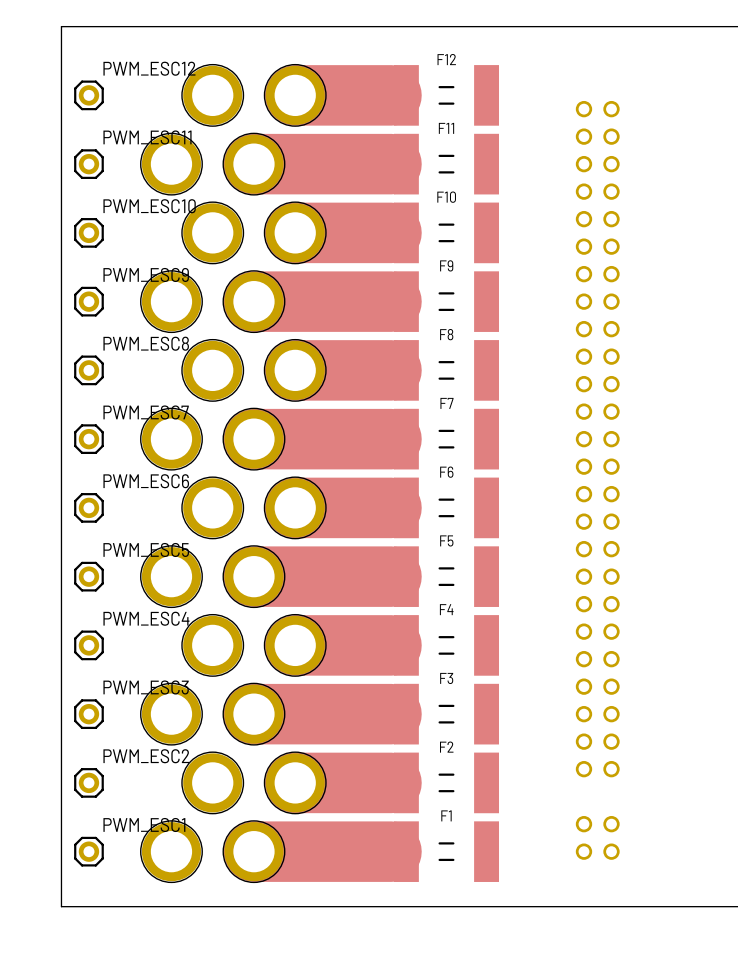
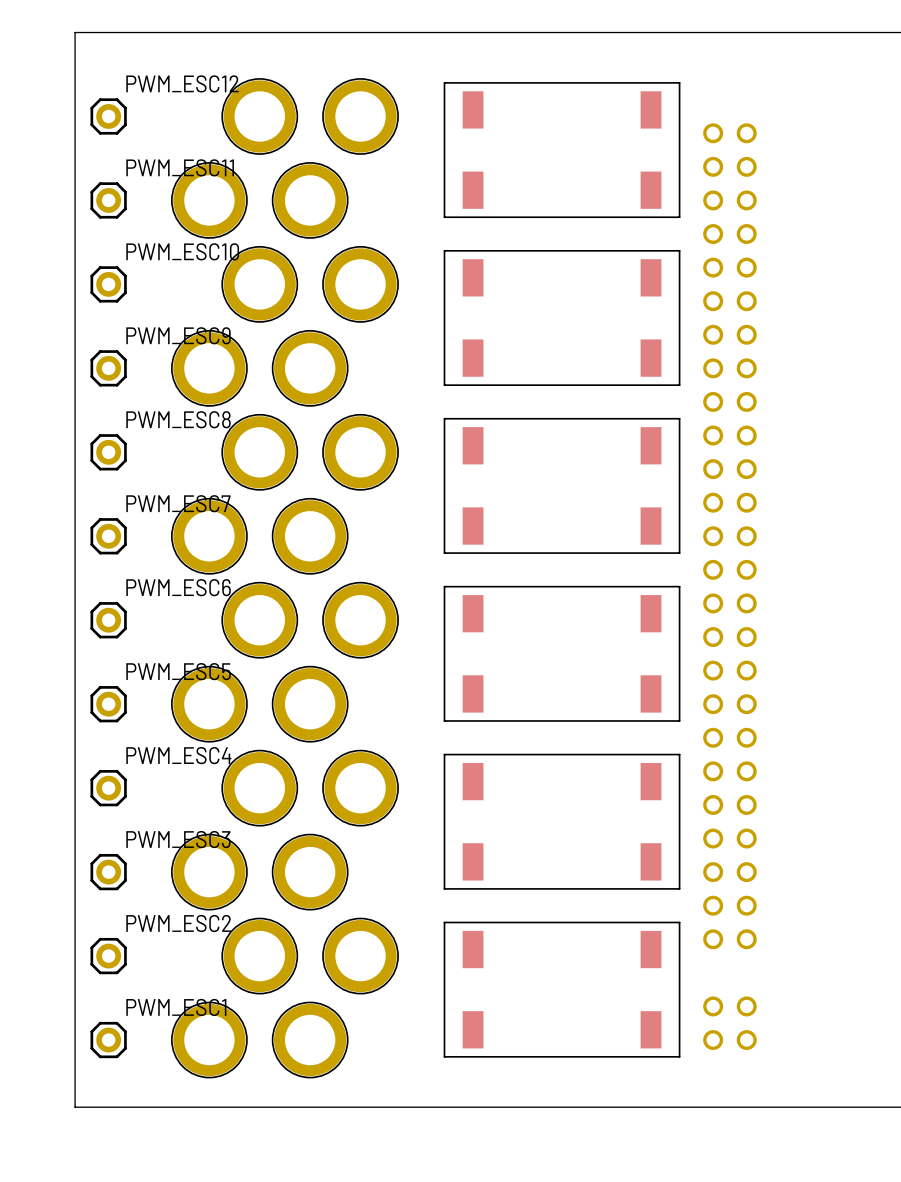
track: (295, 95) (406, 95) -> none
F12: (446, 95) -> none
part: none -> (562, 150)
track: (253, 164) (406, 164) -> none
F11: (446, 164) -> none
track: (295, 232) (406, 232) -> none
F10: (446, 232) -> none
part: none -> (562, 317)
track: (253, 301) (406, 301) -> none
F9: (446, 301) -> none
track: (295, 370) (406, 370) -> none
F8: (446, 370) -> none
part: none -> (562, 485)
track: (253, 439) (406, 439) -> none
F7: (446, 439) -> none
track: (295, 507) (406, 507) -> none
F6: (446, 507) -> none
part: none -> (562, 653)
track: (253, 576) (406, 576) -> none
F5: (446, 576) -> none
track: (295, 645) (406, 645) -> none
F4: (446, 645) -> none
part: none -> (562, 821)
track: (253, 714) (406, 714) -> none
F3: (446, 714) -> none
track: (295, 782) (406, 782) -> none
F2: (446, 782) -> none
part: none -> (562, 989)
track: (253, 851) (406, 851) -> none
F1: (446, 851) -> none

